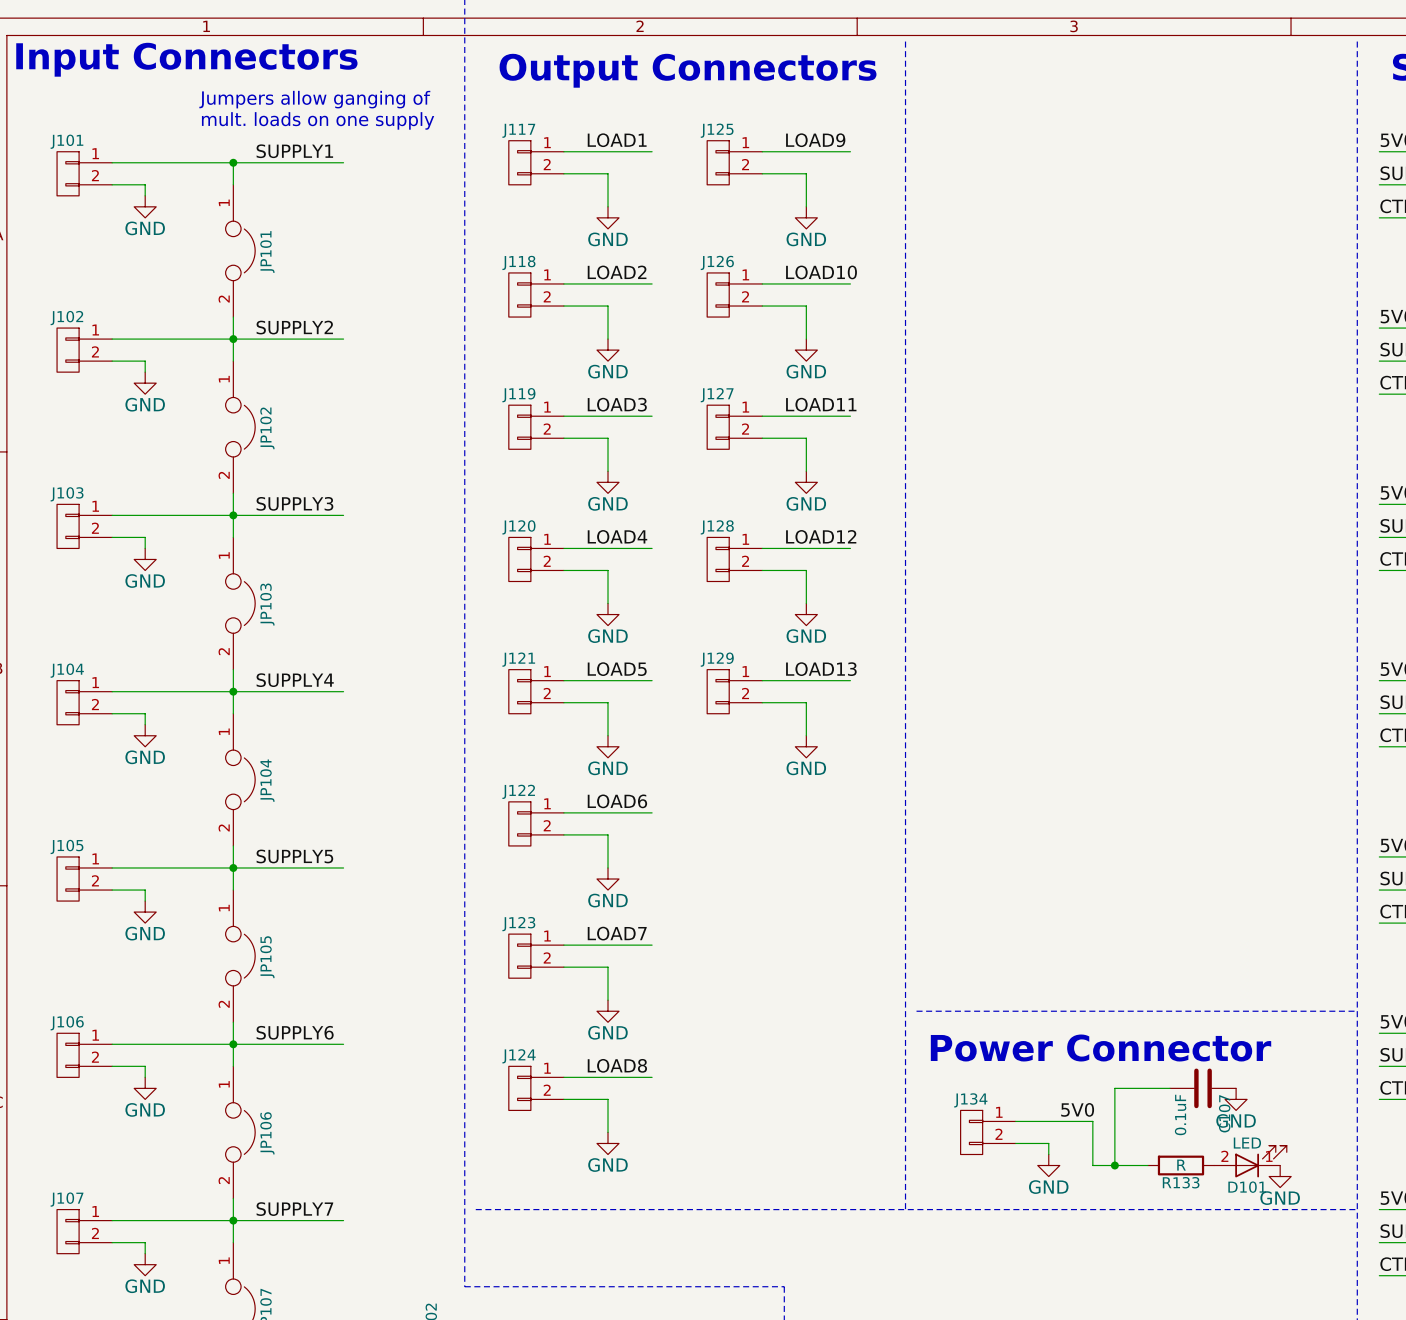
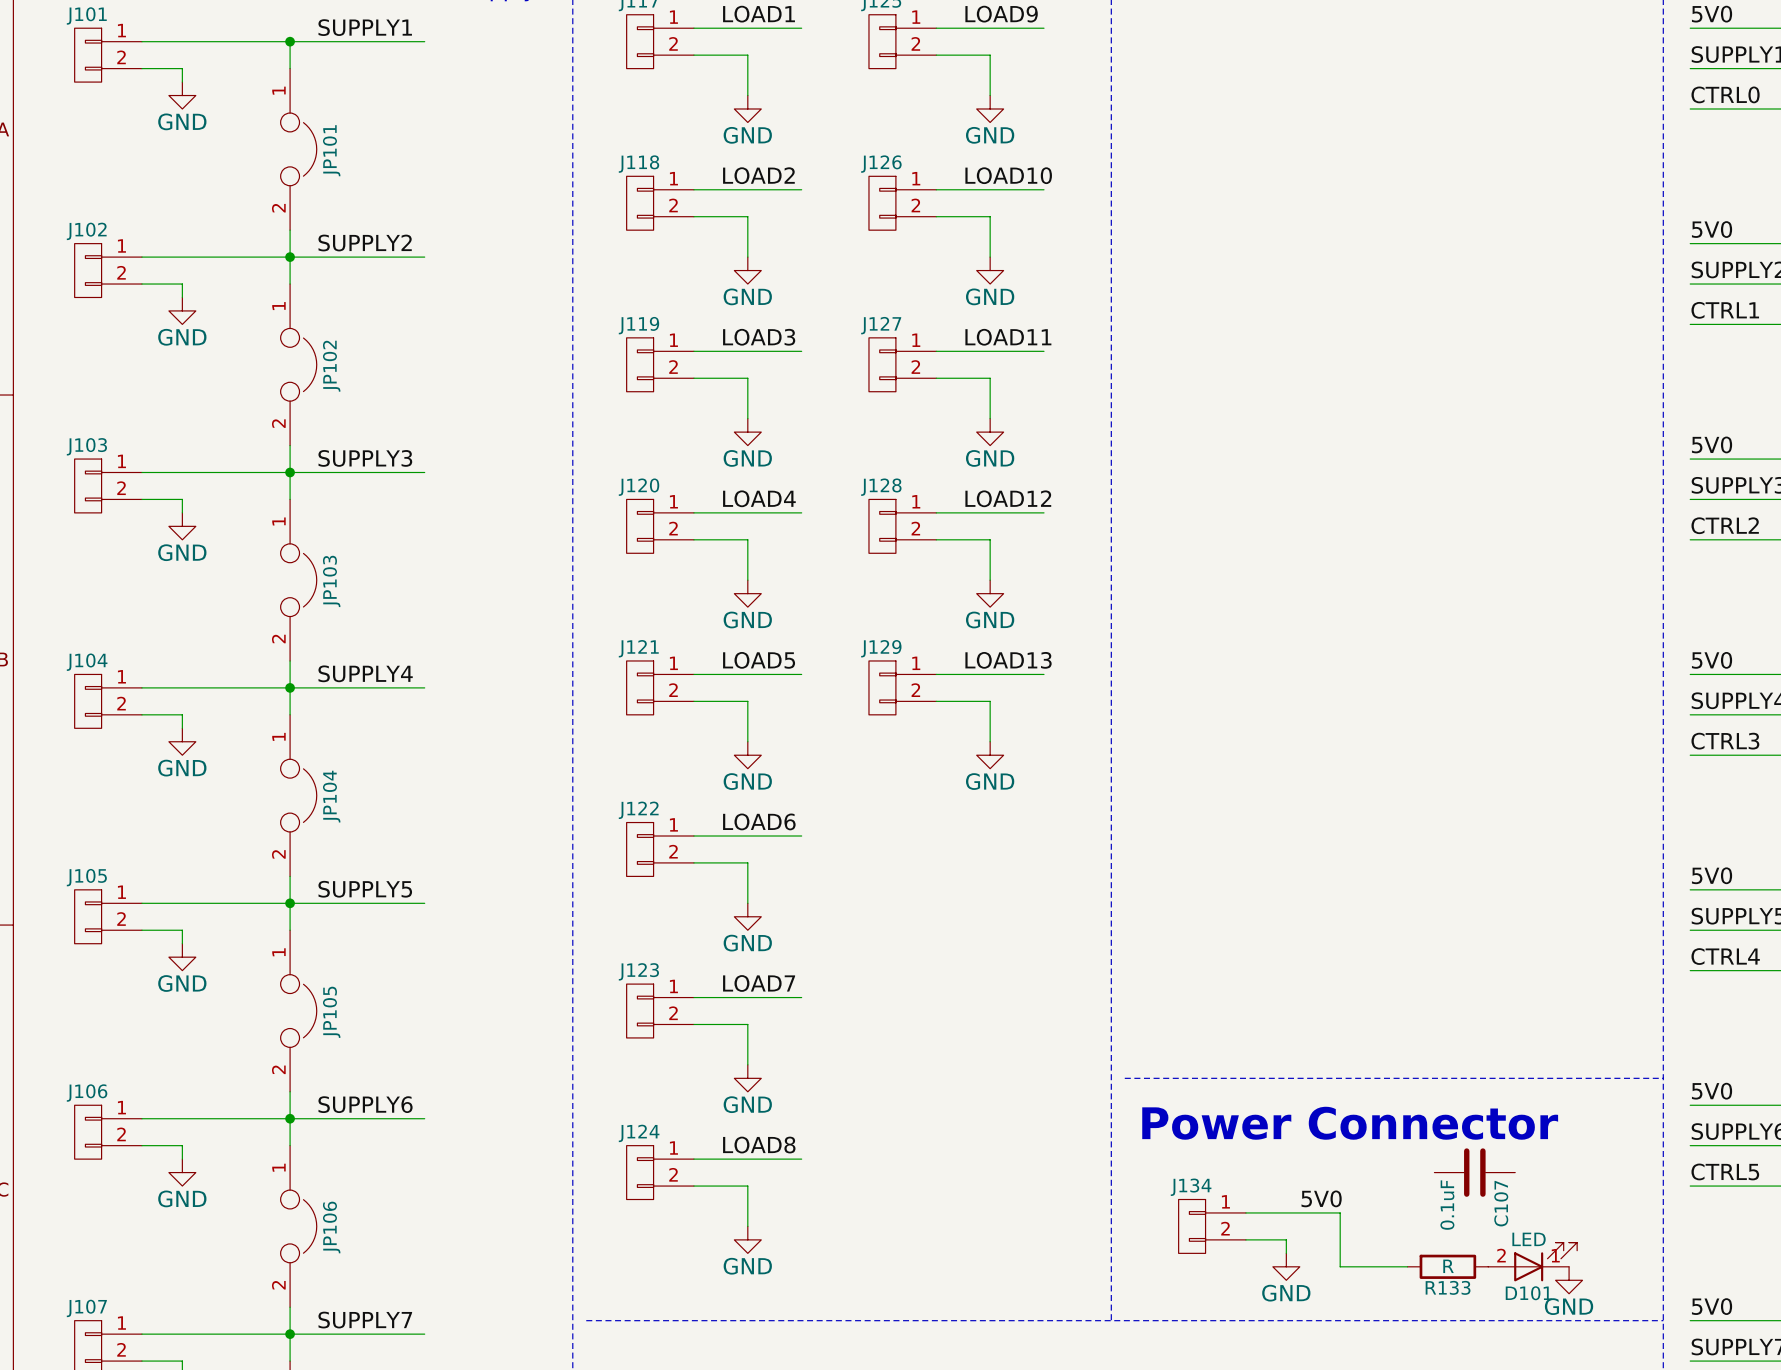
wire: (1169, 1088) (1114, 1088) (1114, 1165) -> none
power symbol: GND (1236, 1099) -> none
junction: (1114, 1165) -> none

